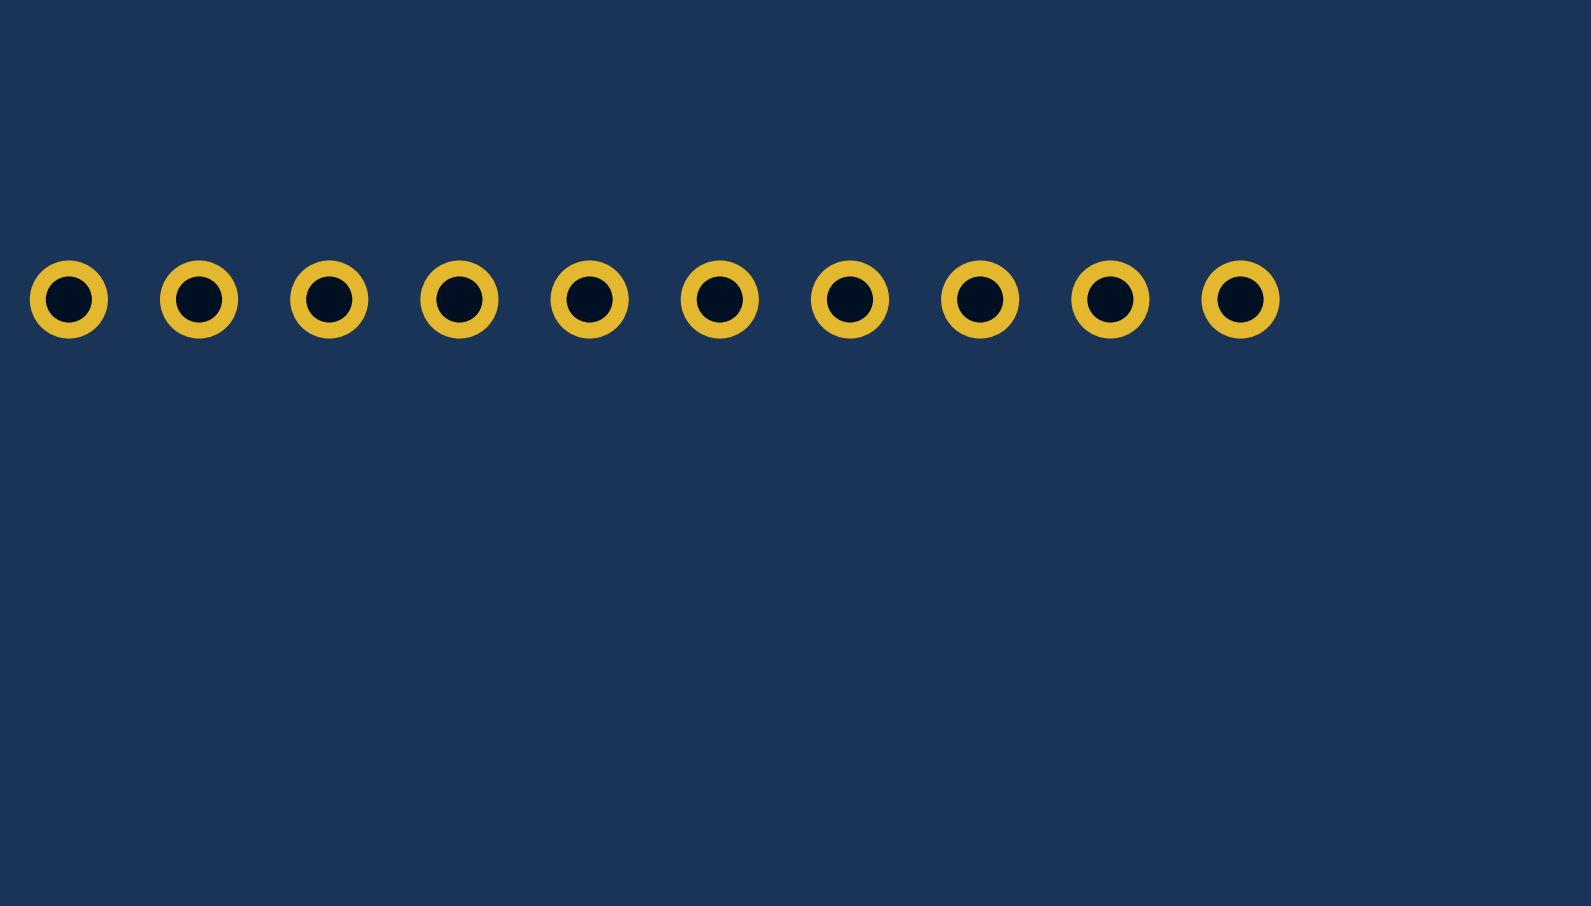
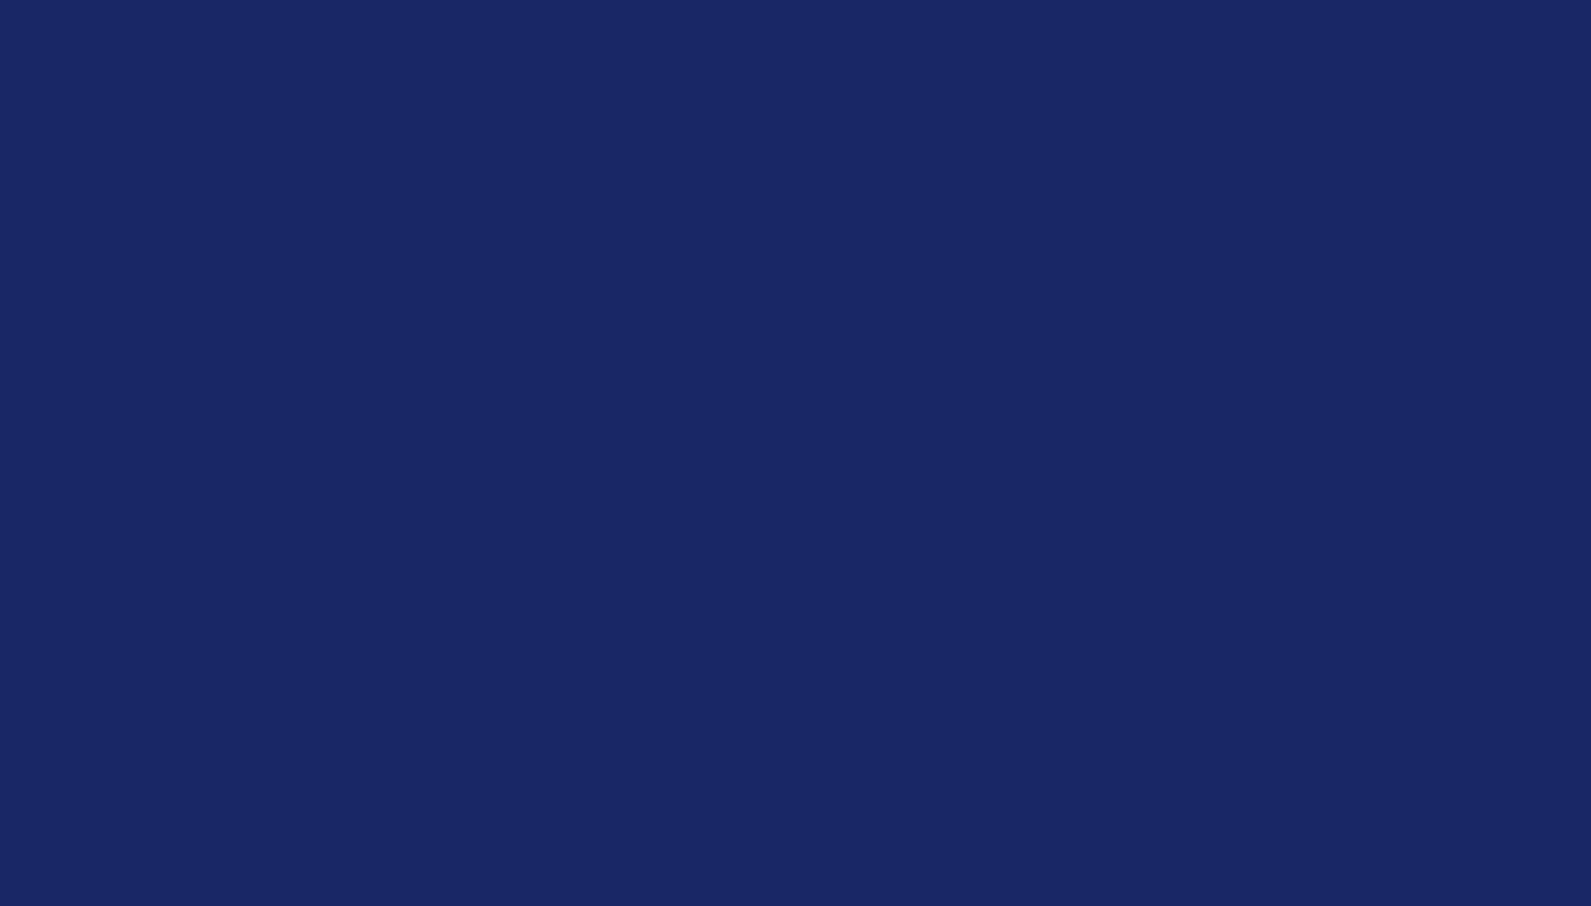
part: (654, 299) -> none

